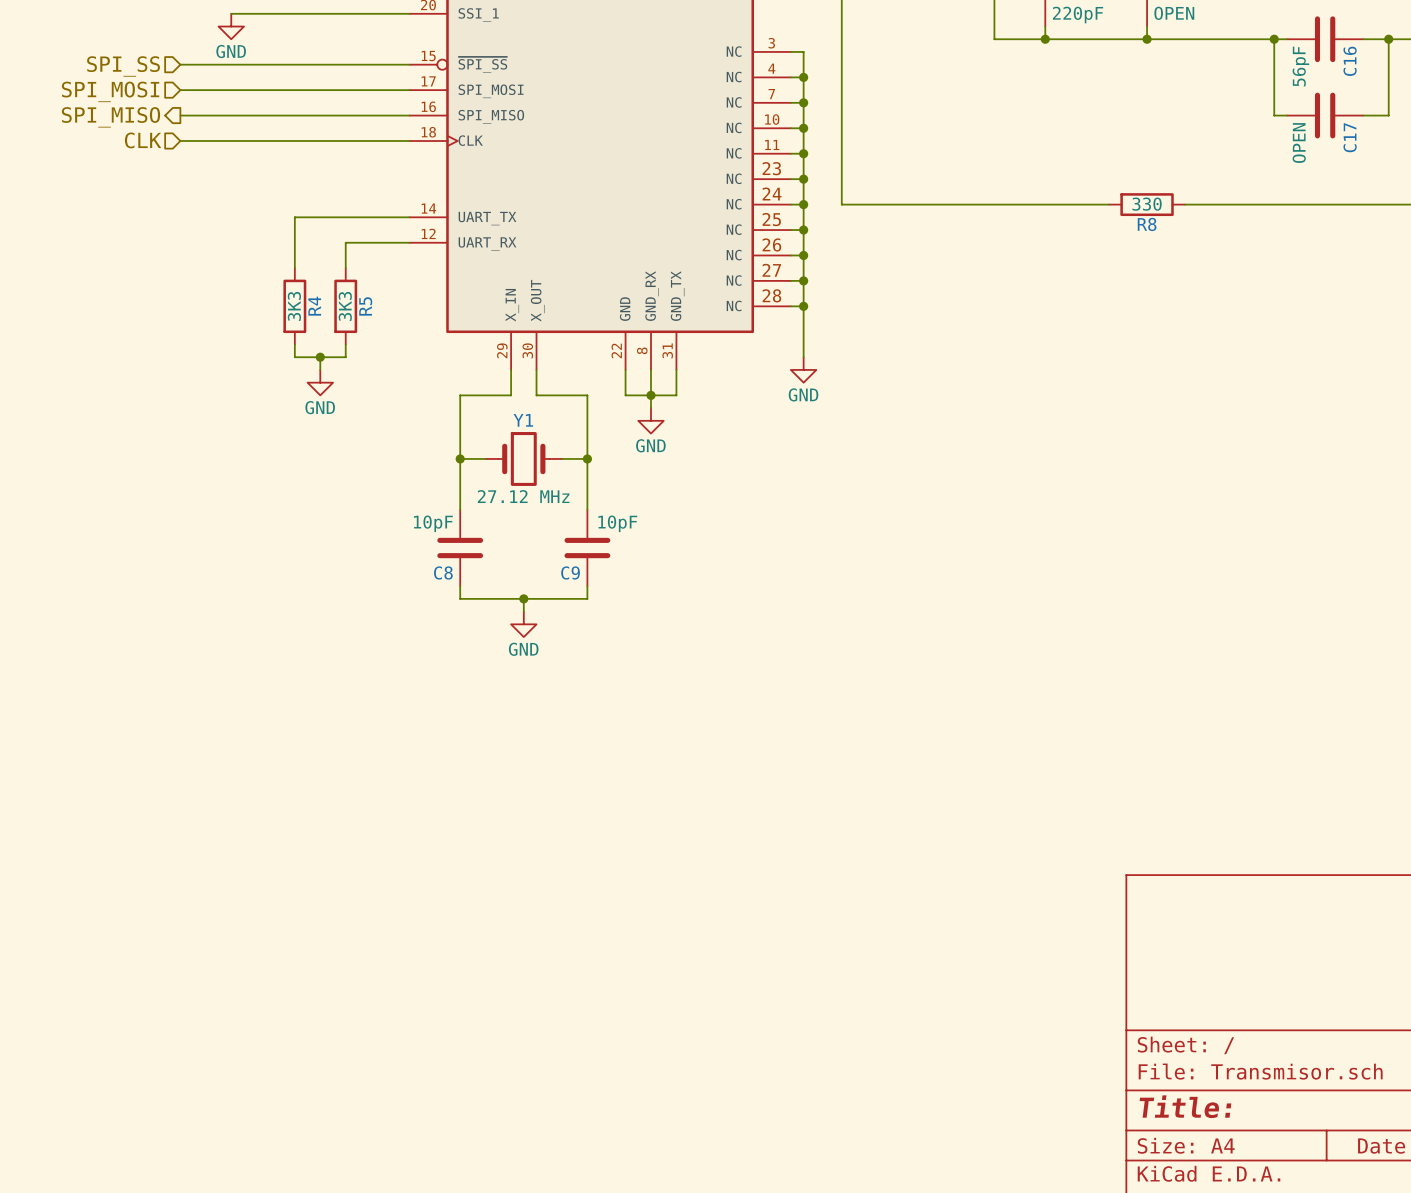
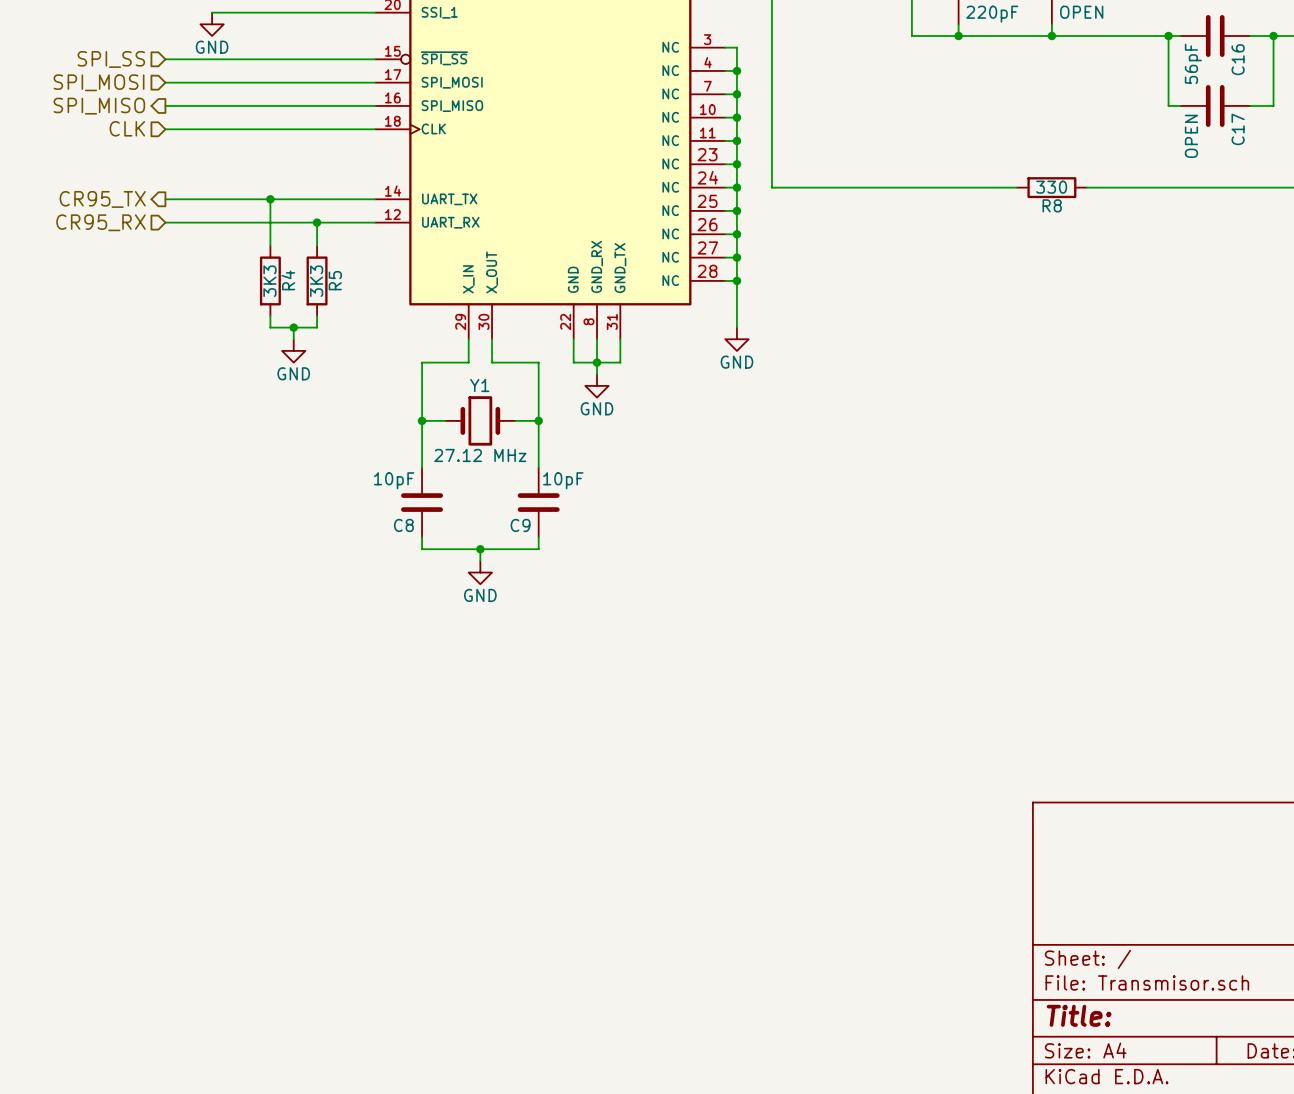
wire: none -> (165, 199) (270, 199)
junction: none -> (270, 199)
hierarchical label: none -> CR95_TX (102, 199)
wire: none -> (165, 222) (317, 222)
junction: none -> (317, 222)
hierarchical label: none -> CR95_RX (101, 222)

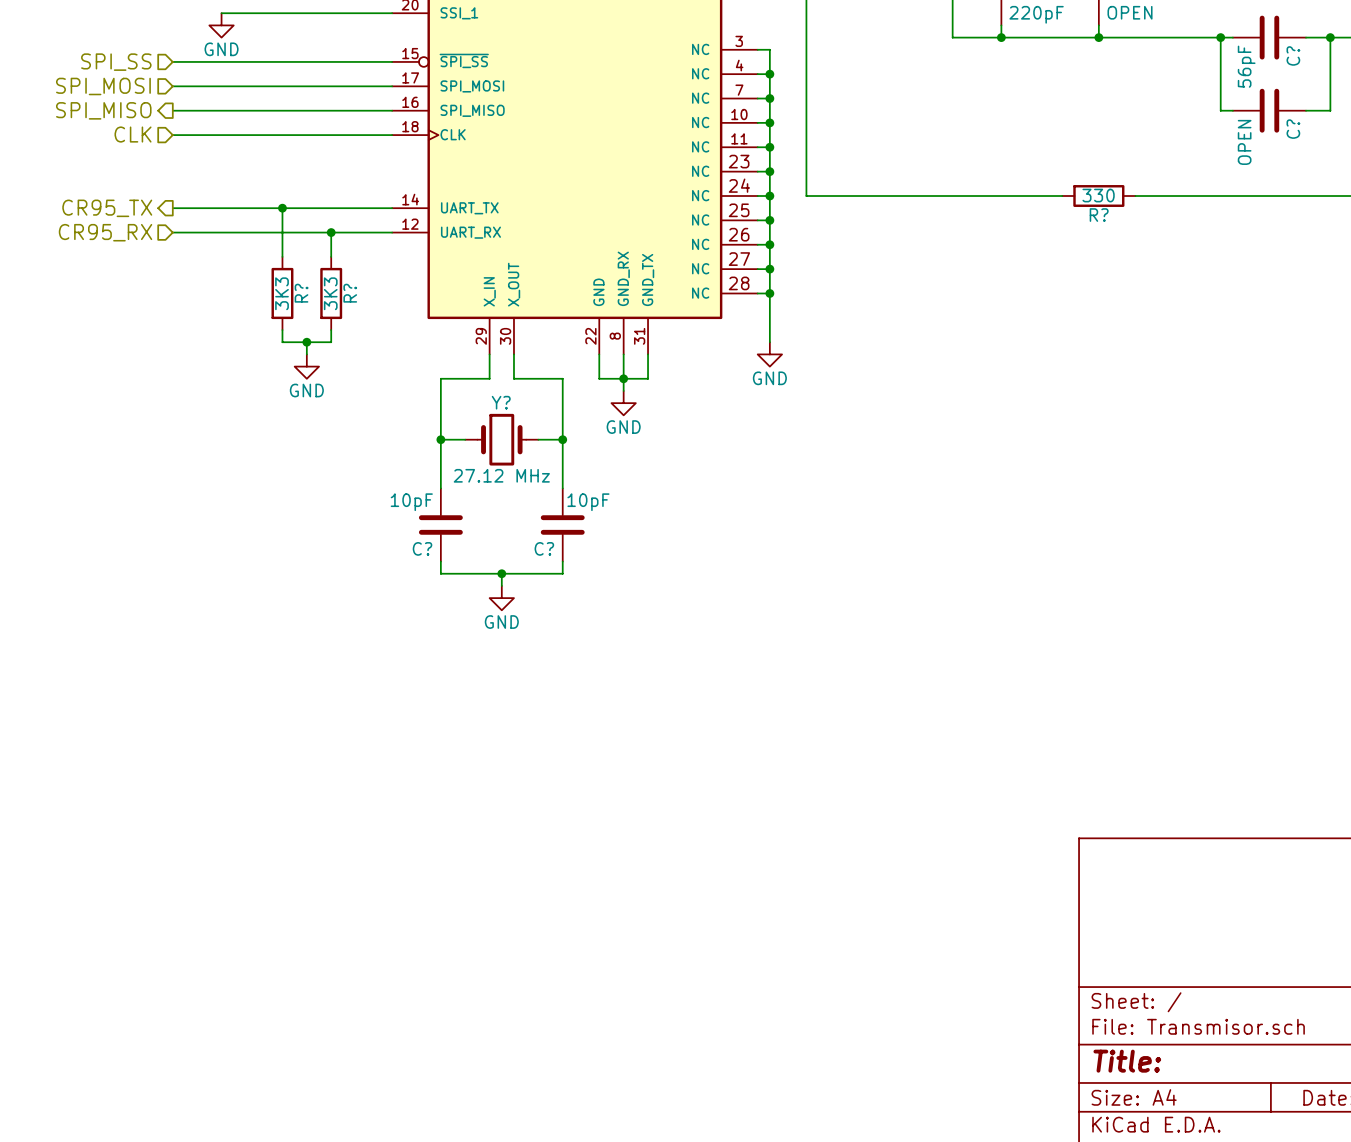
C16 name: C16 (1238, 59) -> C? (1293, 55)
C17 name: C17 (1238, 129) -> C? (1293, 129)
R8 name: R8 (1052, 205) -> R? (1099, 215)
R4 name: R4 (288, 280) -> R? (301, 293)
R5 name: R5 (335, 280) -> R? (350, 293)
Y1 name: Y1 (479, 385) -> Y? (501, 402)
C8 name: C8 (403, 525) -> C? (422, 548)
C9 name: C9 (520, 525) -> C? (544, 548)

